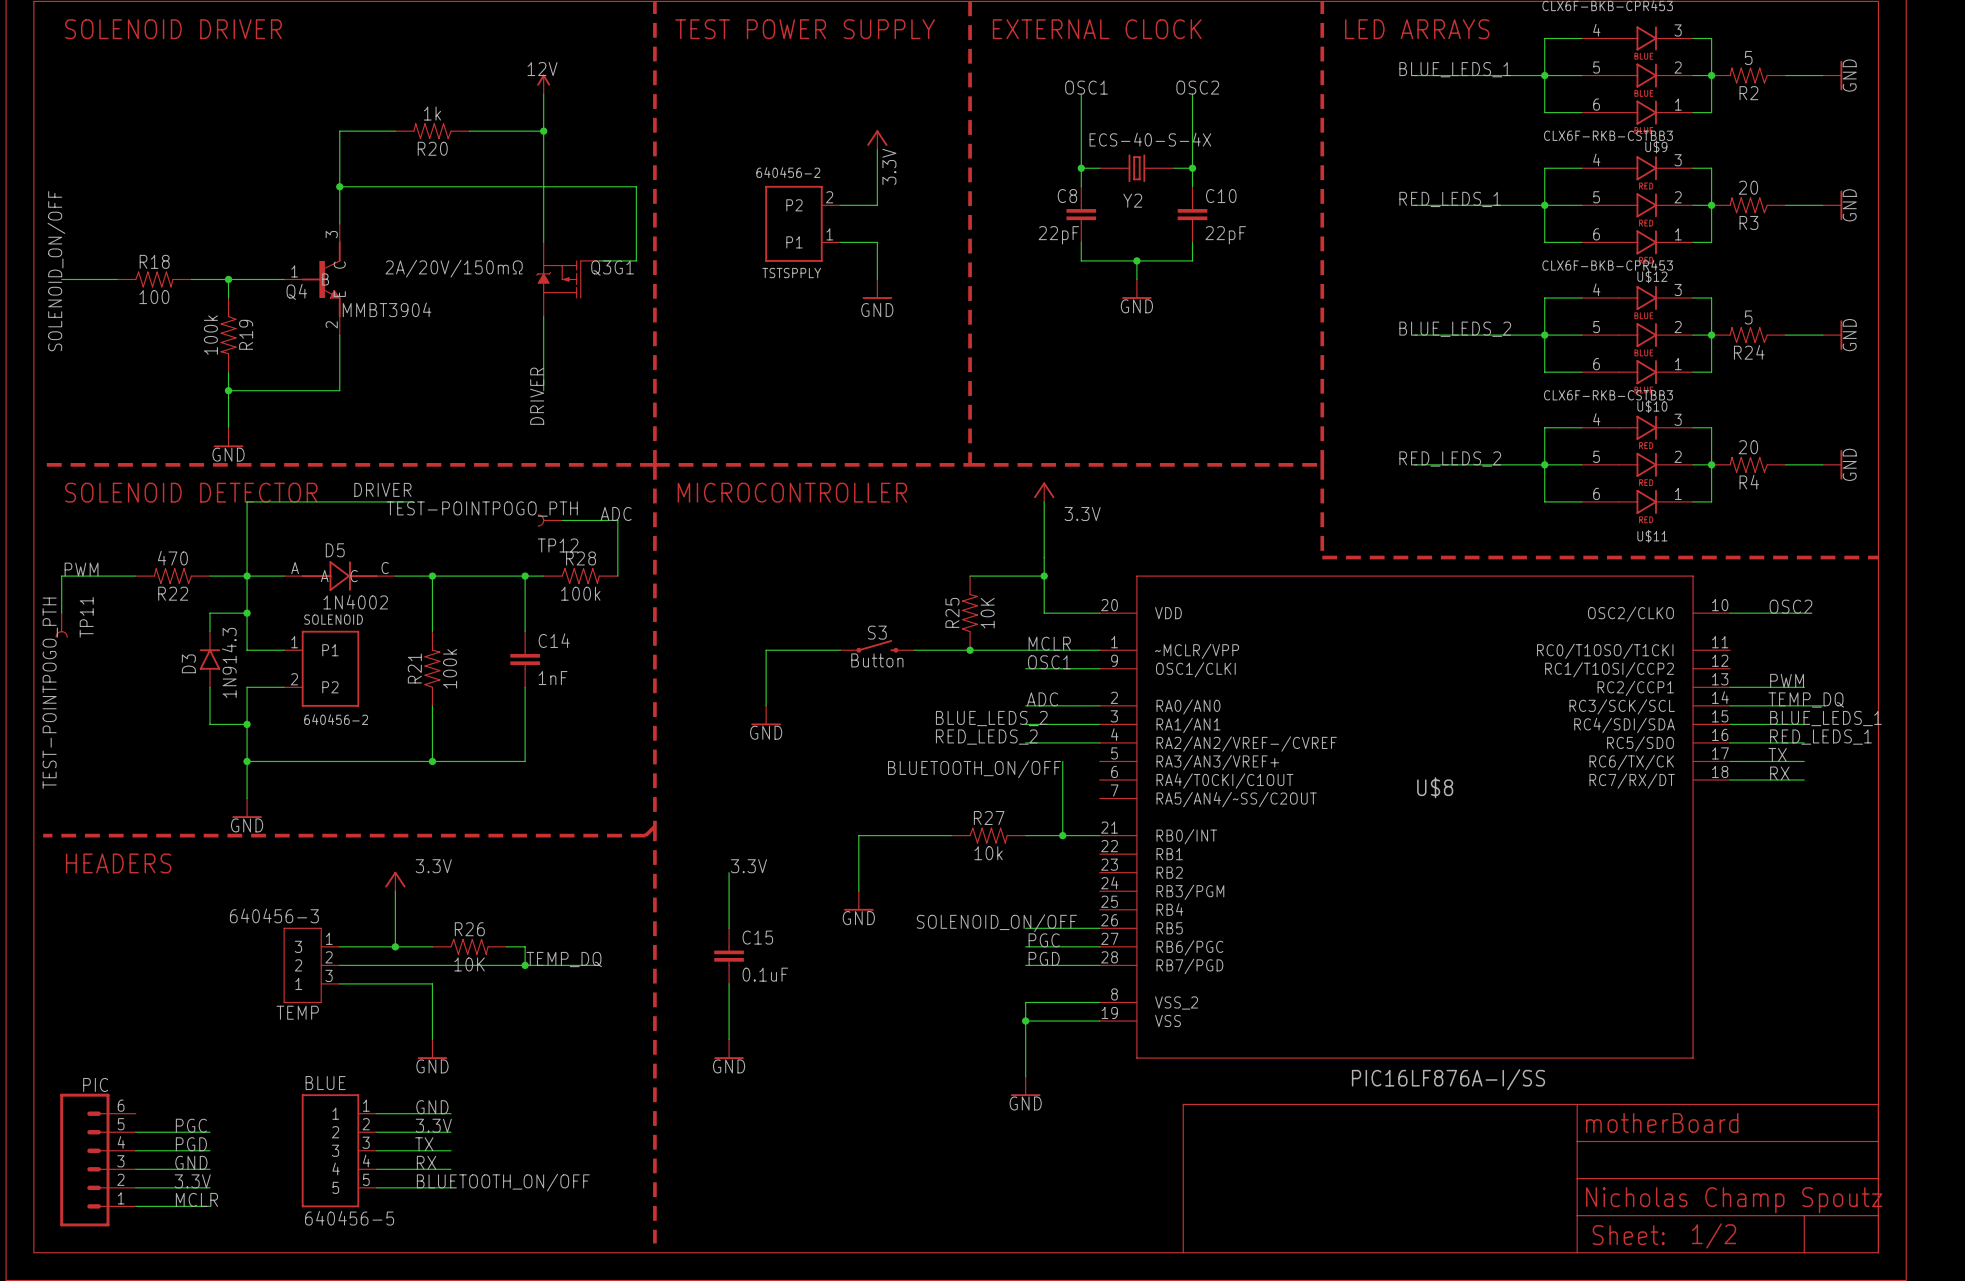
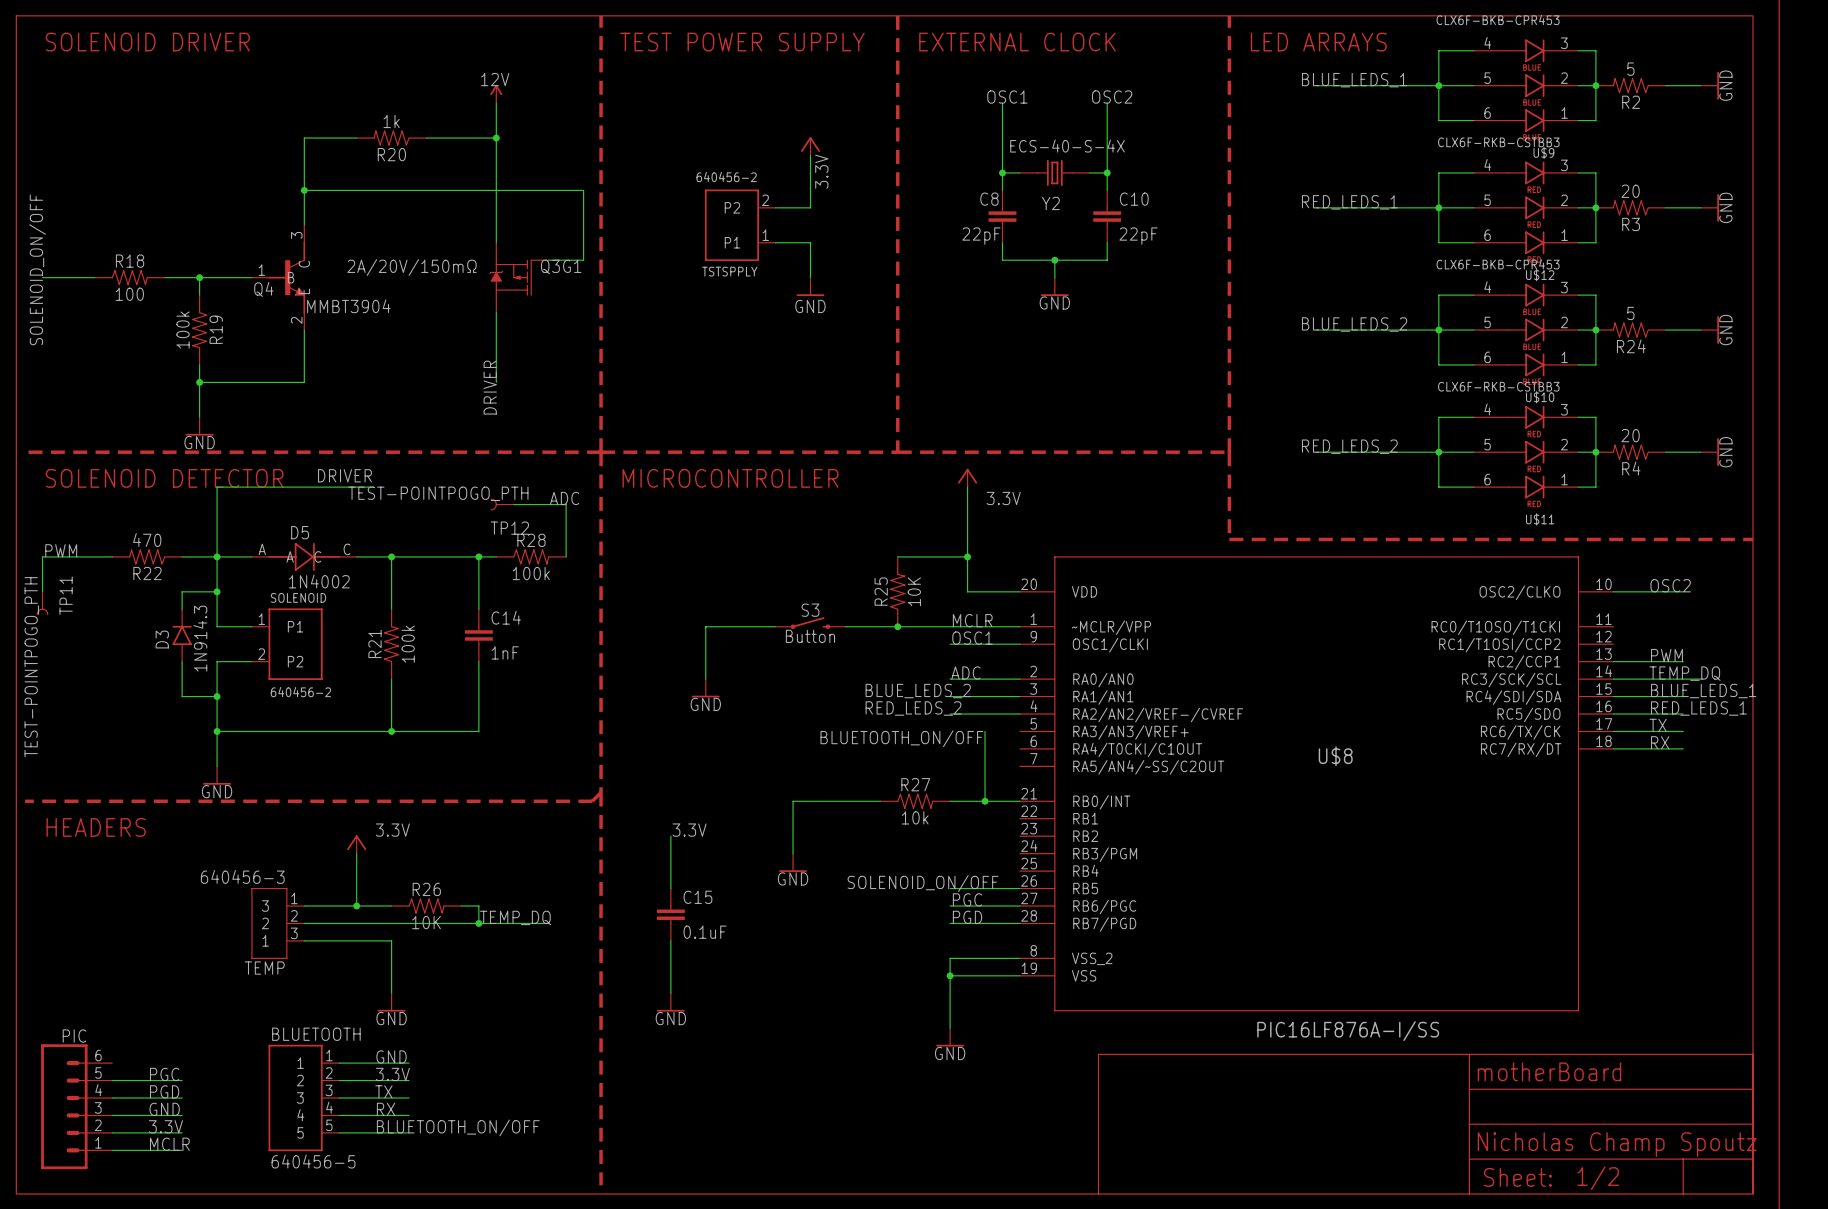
BLUE name: BLUE (325, 1083) -> BLUETOOTH (316, 1034)

